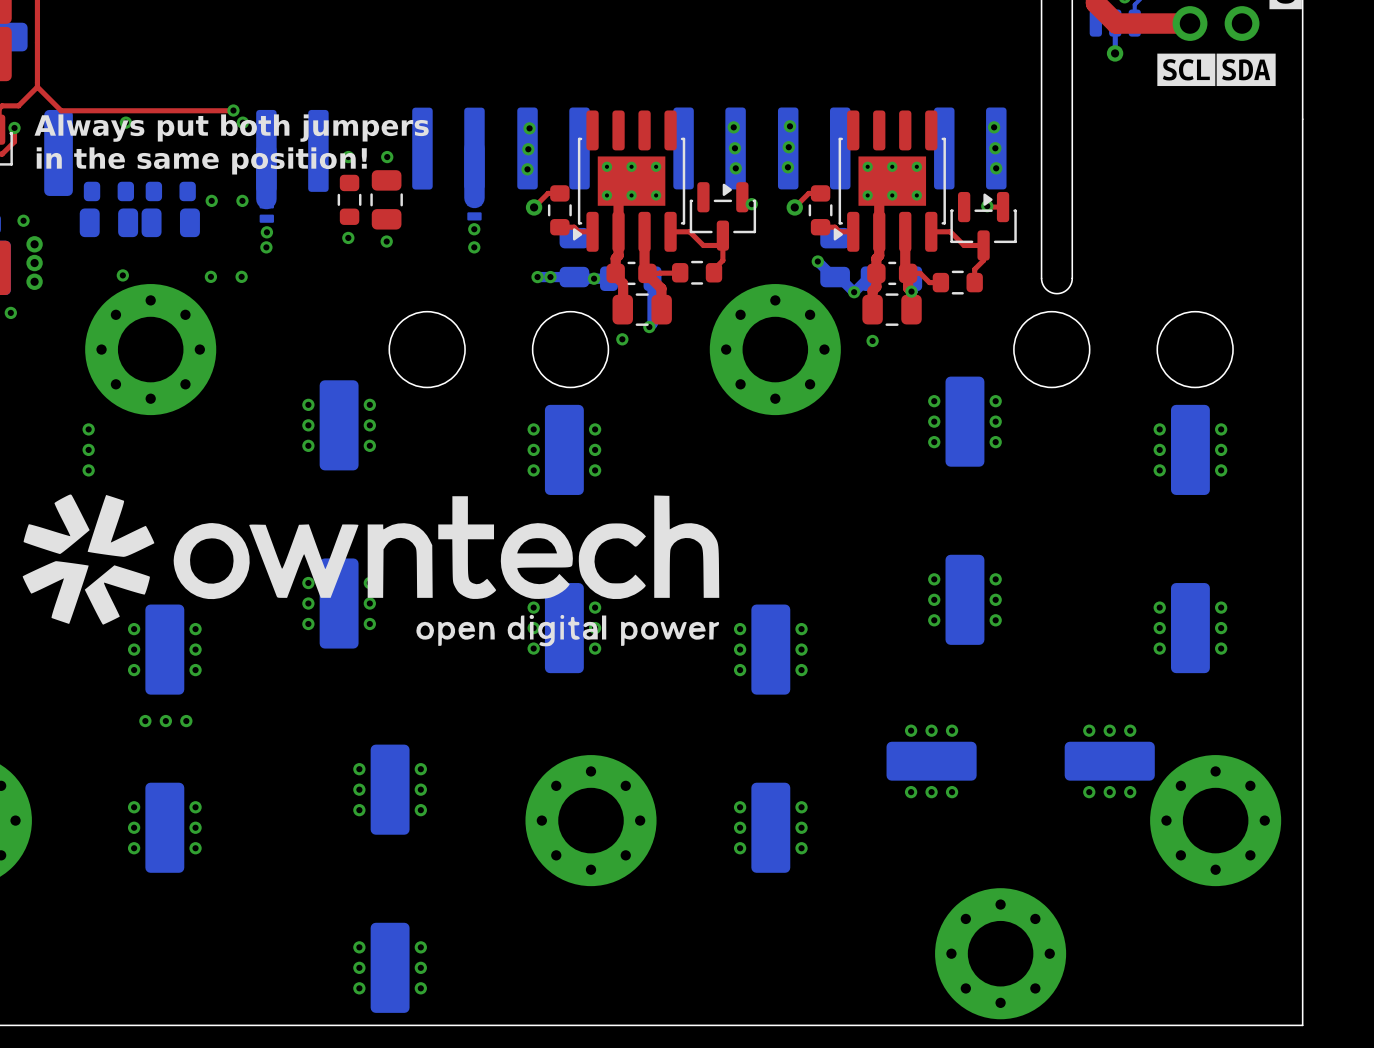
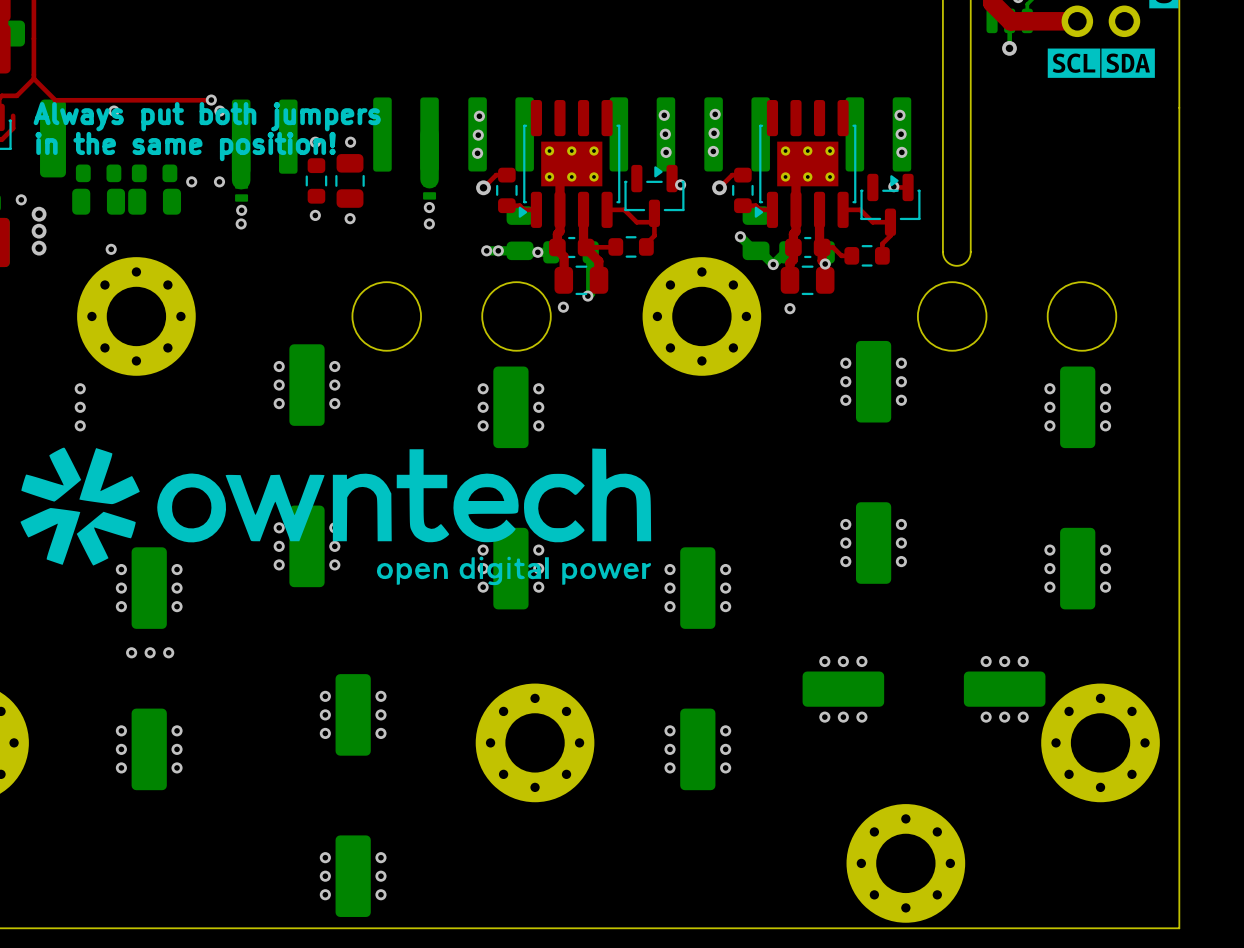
via: (14, 127) -> none
via: none -> (39, 214)
via: (34, 244) -> none
via: none -> (39, 231)
via: (34, 263) -> none
via: none -> (39, 248)
via: (210, 276) -> none
via: (241, 276) -> none
via: (34, 281) -> none
via: (10, 312) -> none

